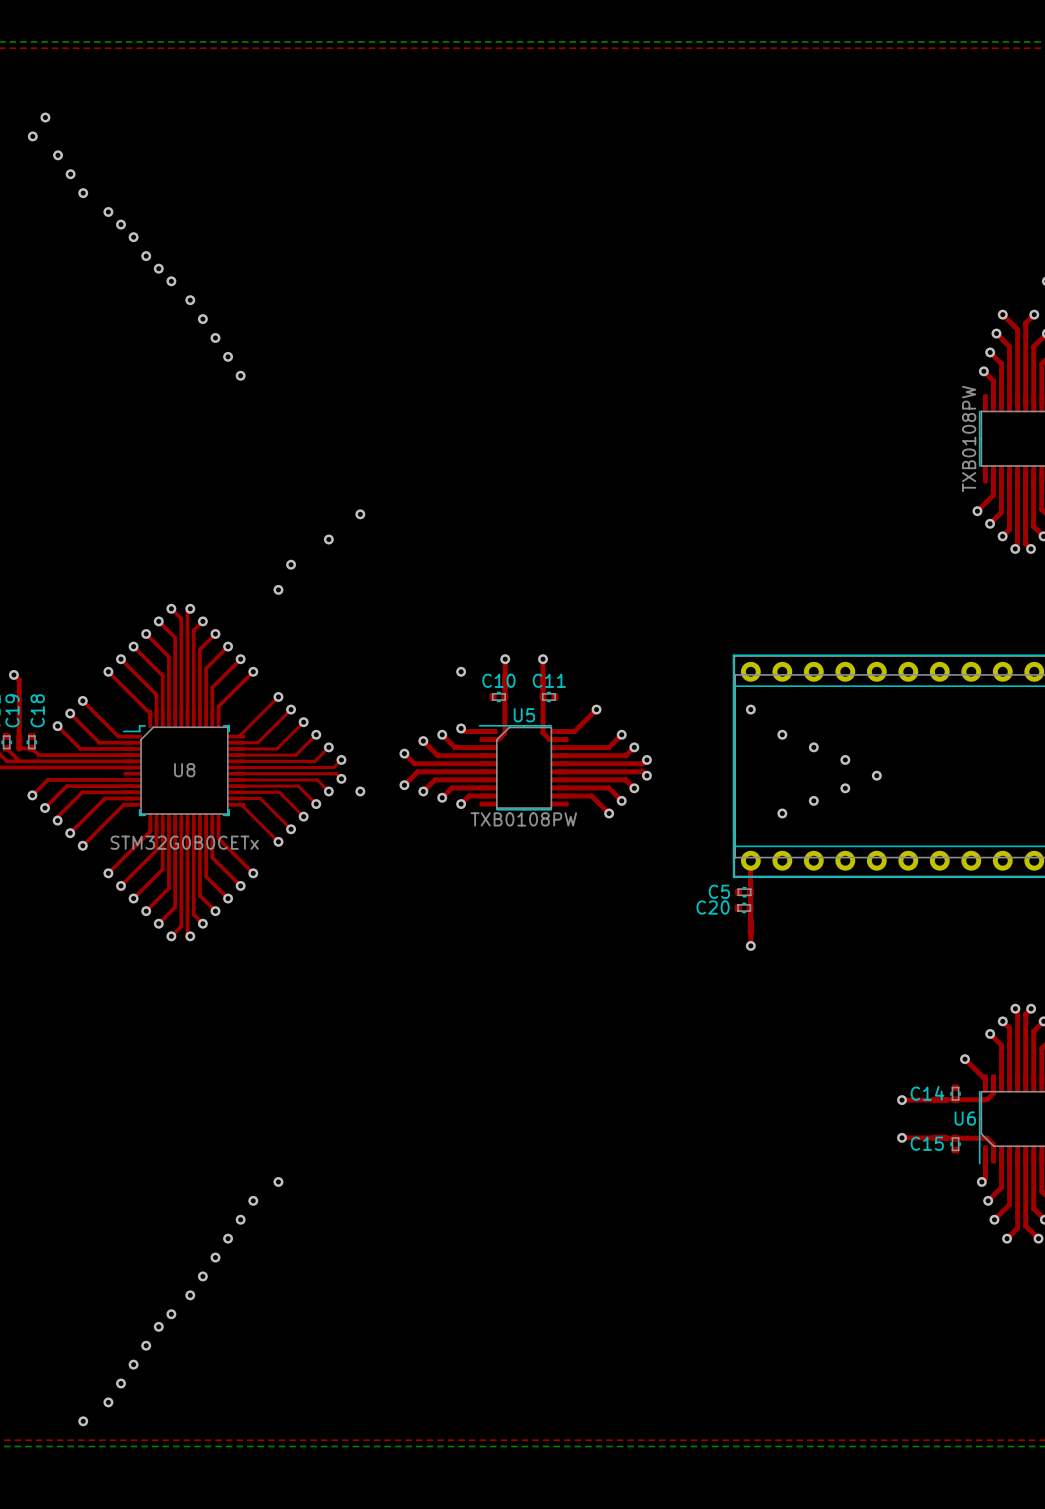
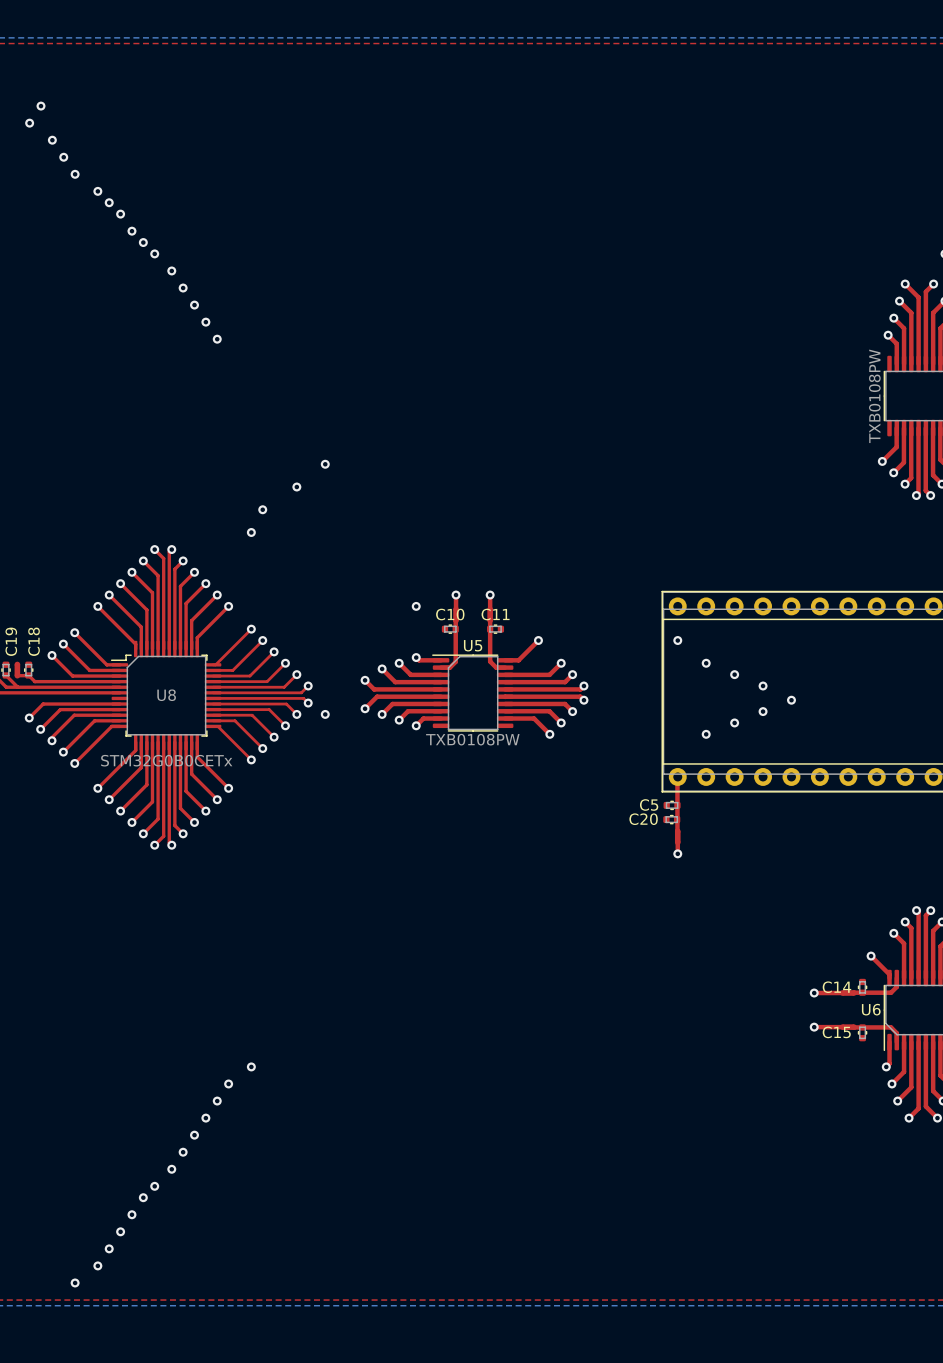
top track: (13, 674) (19, 680) (19, 736) -> none
via: (13, 674) -> none

